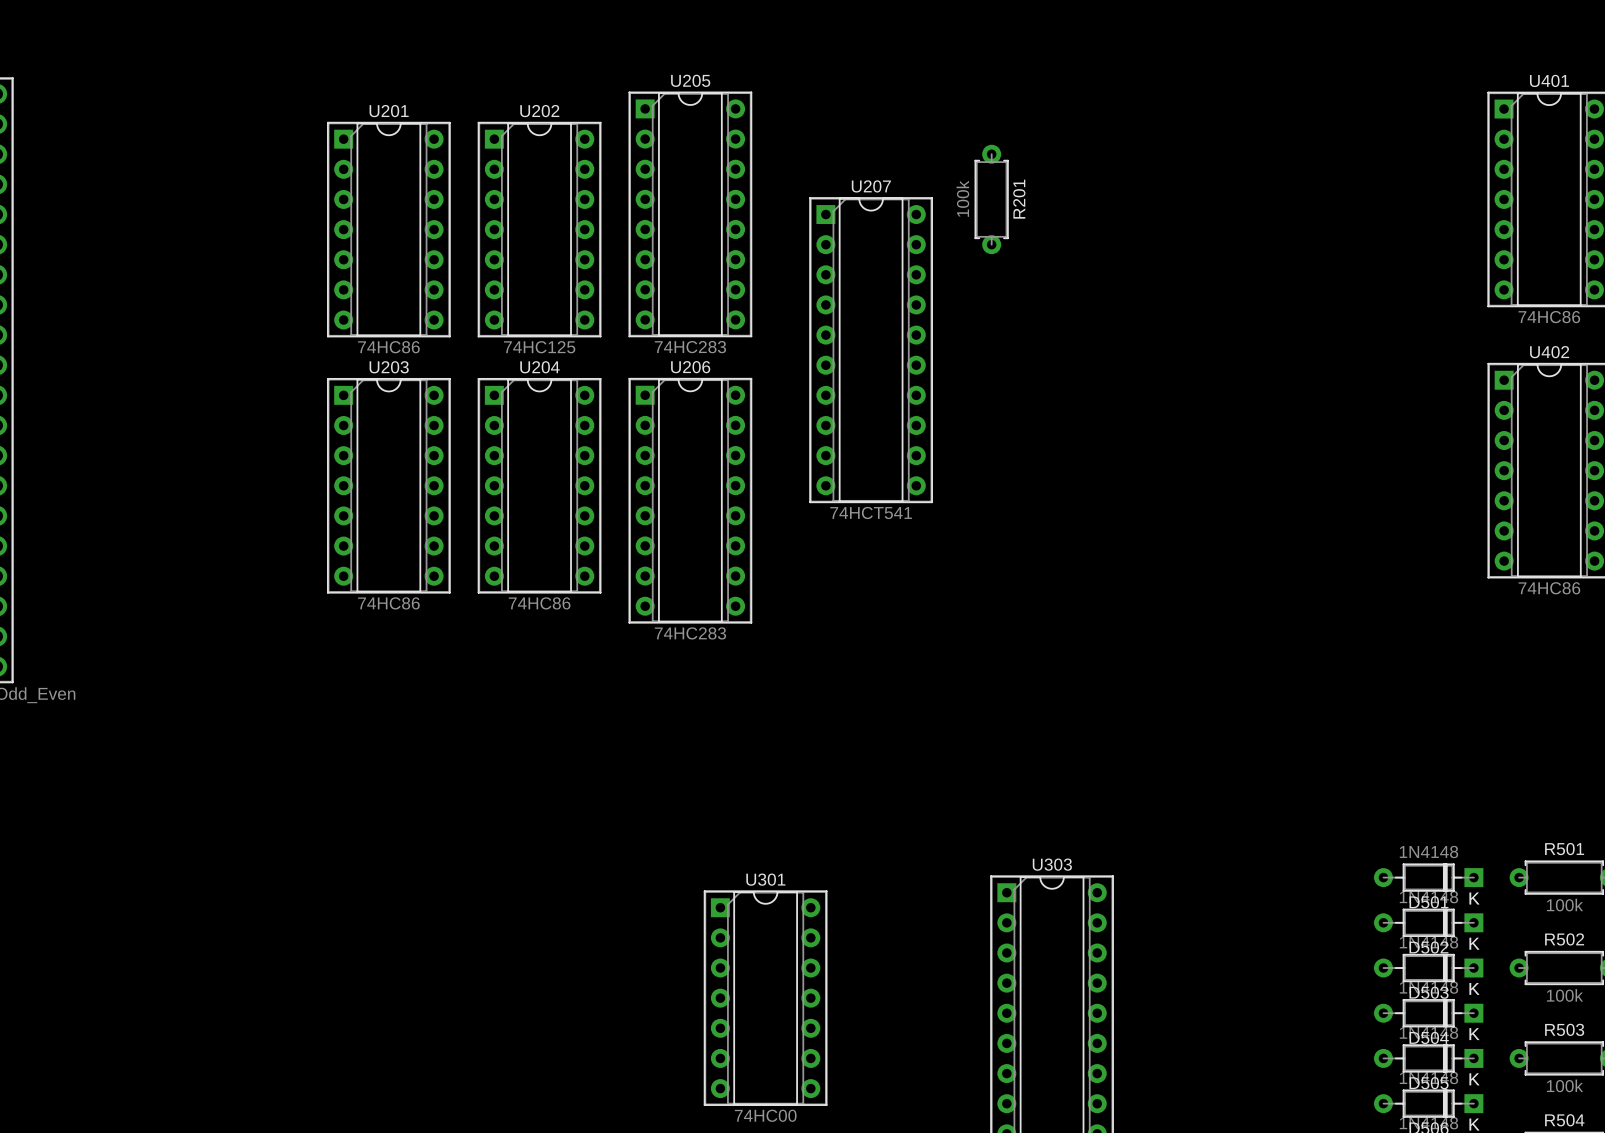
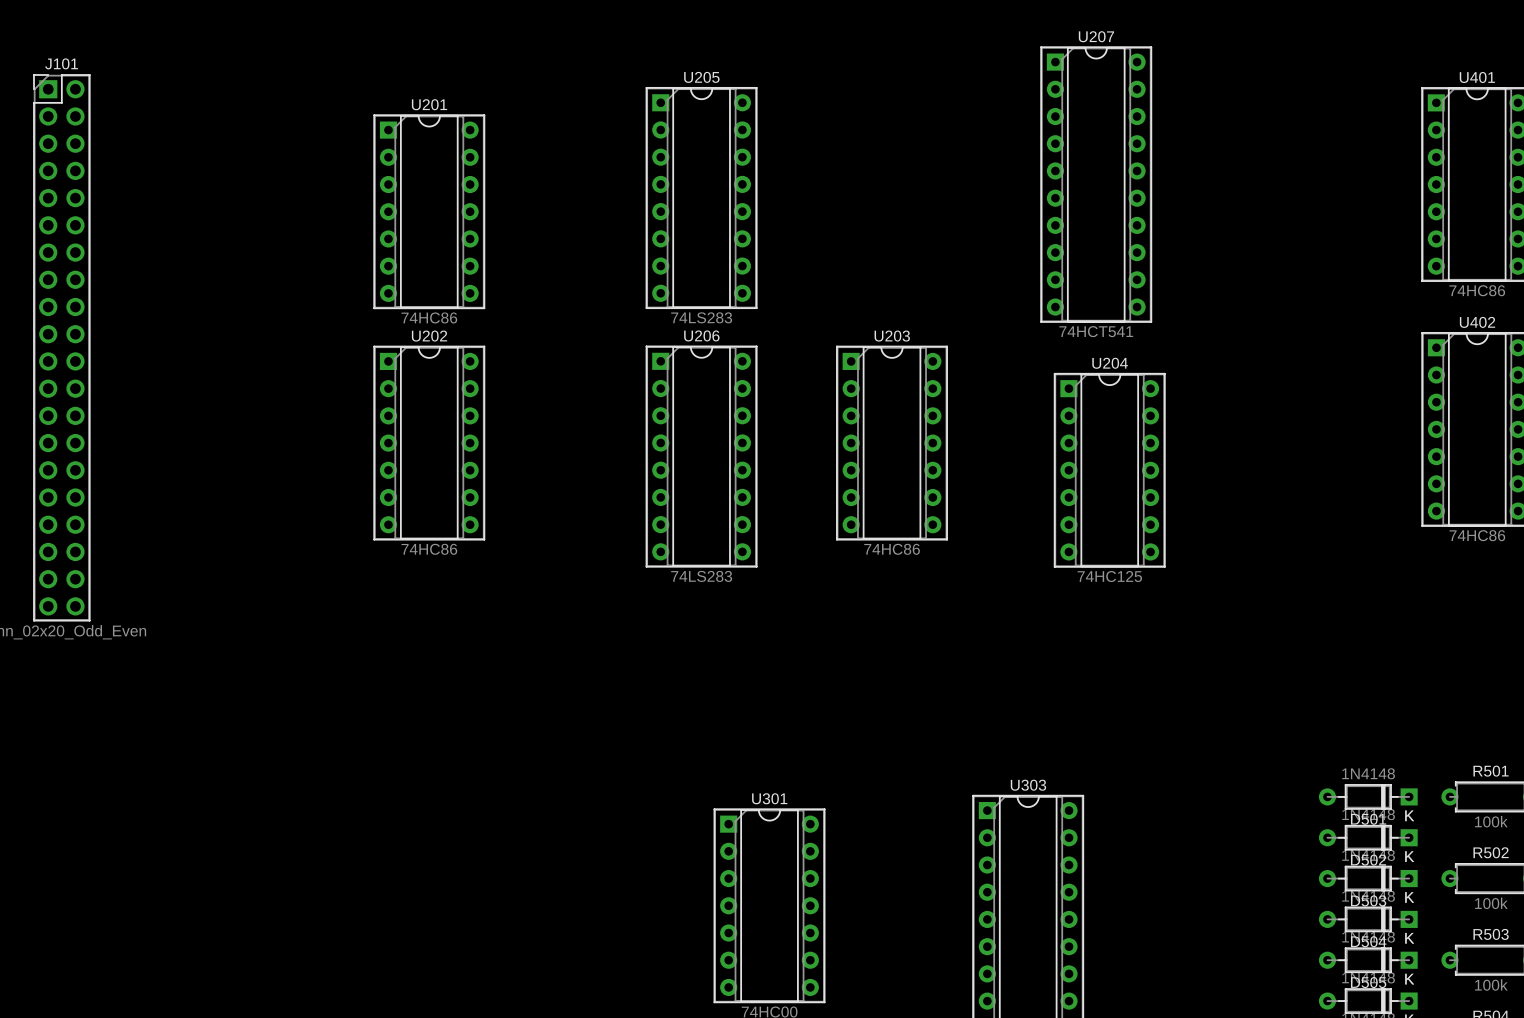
R201: 100k (991, 199) -> none
U202: 74HC125 (539, 229) -> none
U205 value: 74HC283 (690, 347) -> 74LS283 (701, 317)
U207 position: (871, 350) -> (1096, 184)
U203 name: U203 (389, 367) -> U202 (429, 336)
U204 position: (539, 485) -> (1109, 470)
U203: none -> 74HC86 (892, 443)
U204 value: 74HC86 (539, 603) -> 74HC125 (1109, 576)
U206 value: 74HC283 (690, 633) -> 74LS283 (701, 576)

